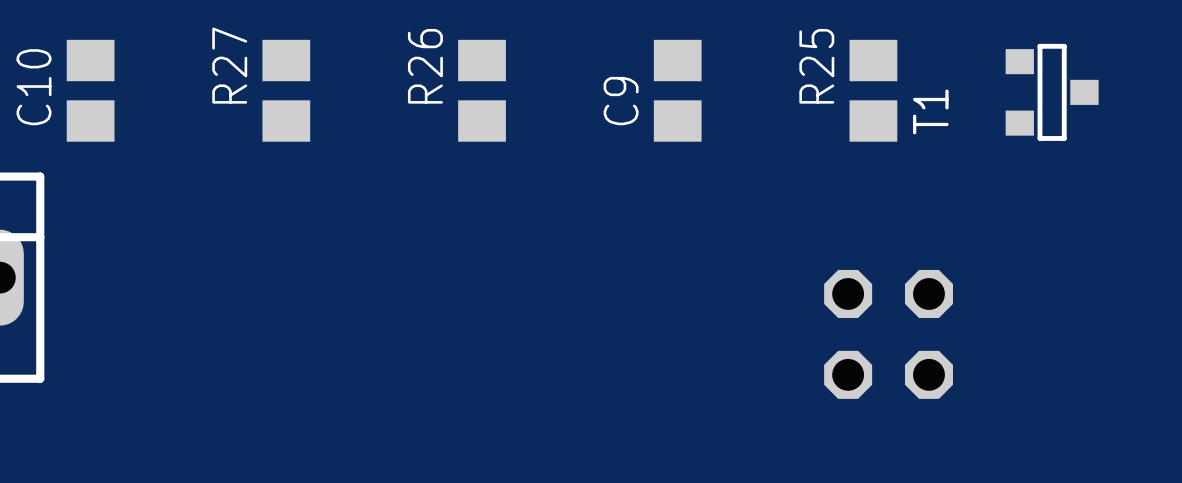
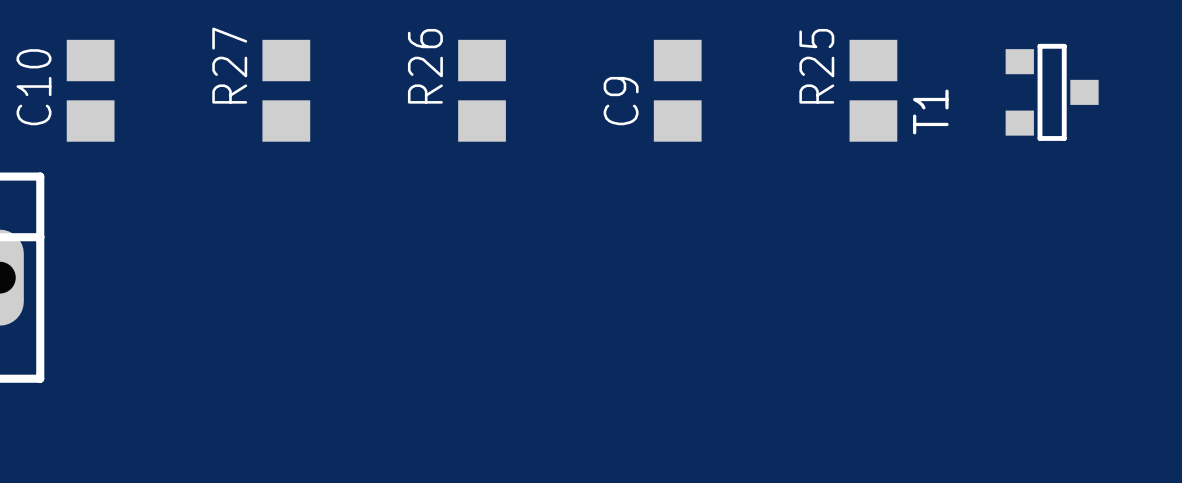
part: (888, 334) -> none

